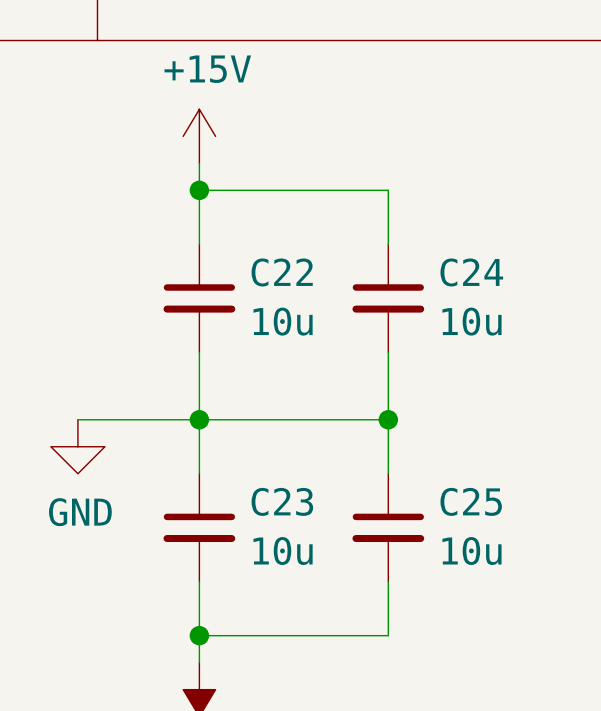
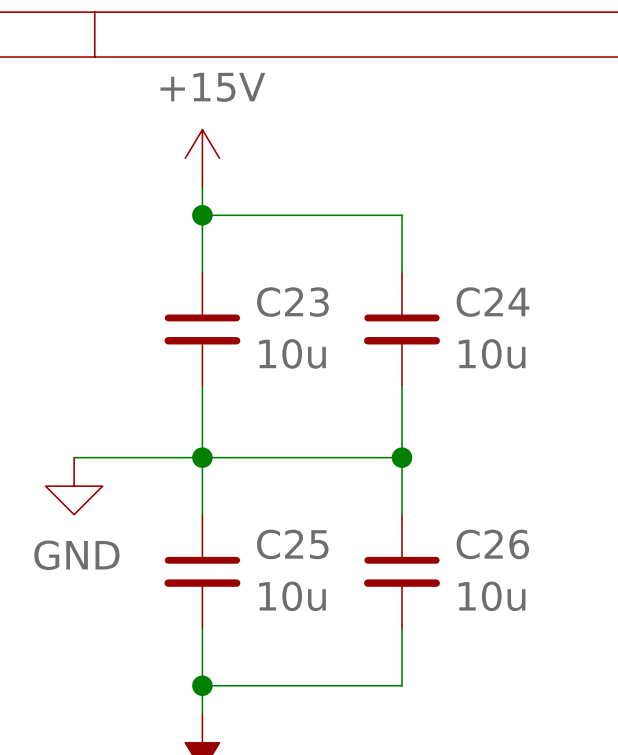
C22 name: C22 (282, 272) -> C23 (292, 302)
C23 name: C23 (282, 501) -> C25 (292, 544)
C25 name: C25 (471, 501) -> C26 (492, 544)

